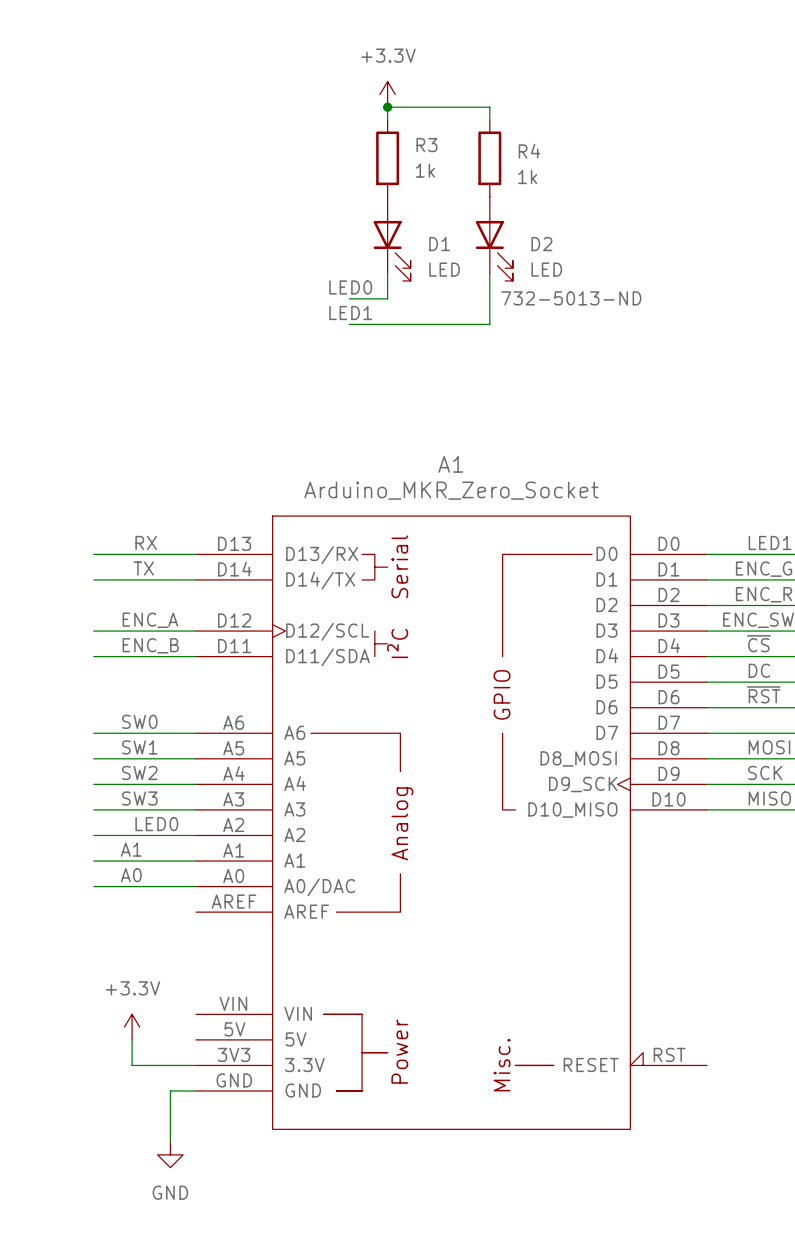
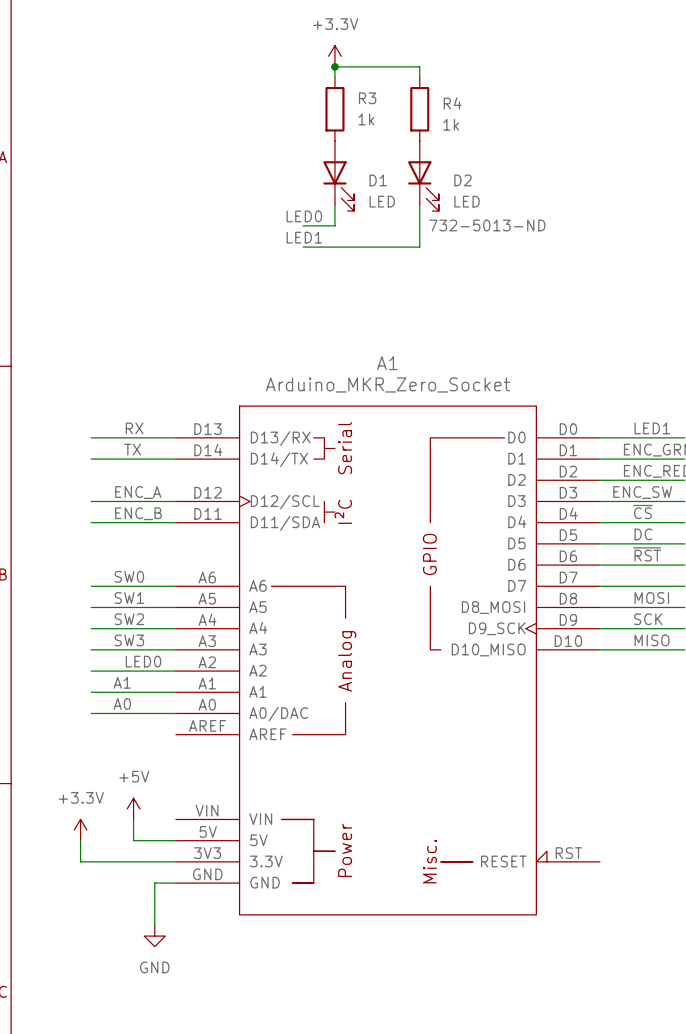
power symbol: none -> +5V (133, 808)
wire: none -> (133, 819) (133, 840) (175, 840)
power symbol position: +3.3V (132, 1027) -> +3.3V (80, 830)
wire: (132, 1039) (132, 1065) -> (80, 840) (80, 861) (122, 861)

